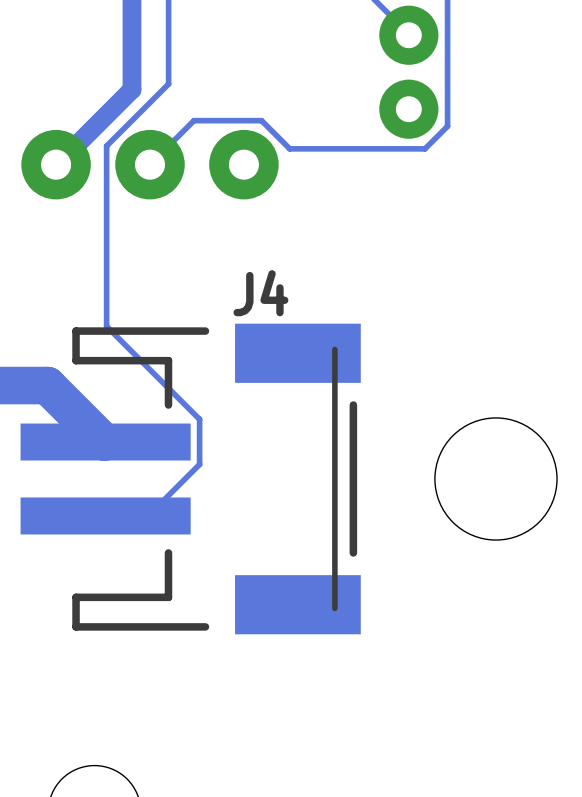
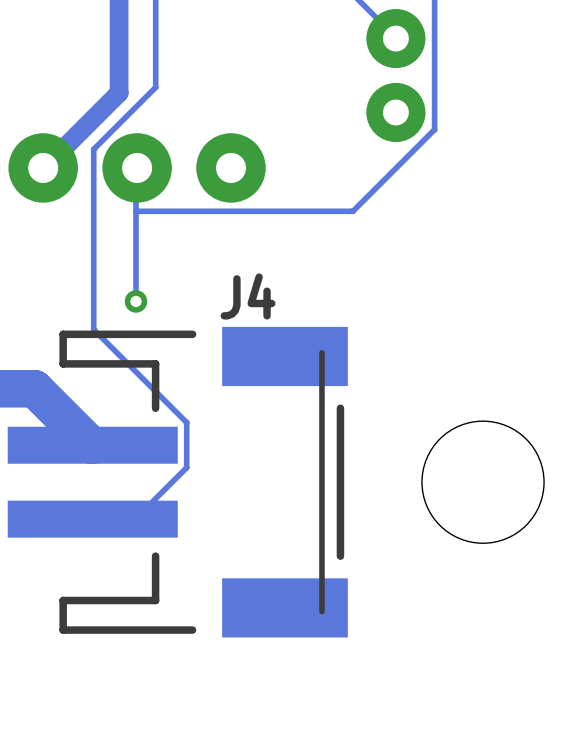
track: (425, 148) (289, 148) (261, 120) (193, 120) (149, 164) -> (412, 152) (352, 211) (135, 211)
track: none -> (137, 167) (135, 301)
via: none -> (135, 301)

